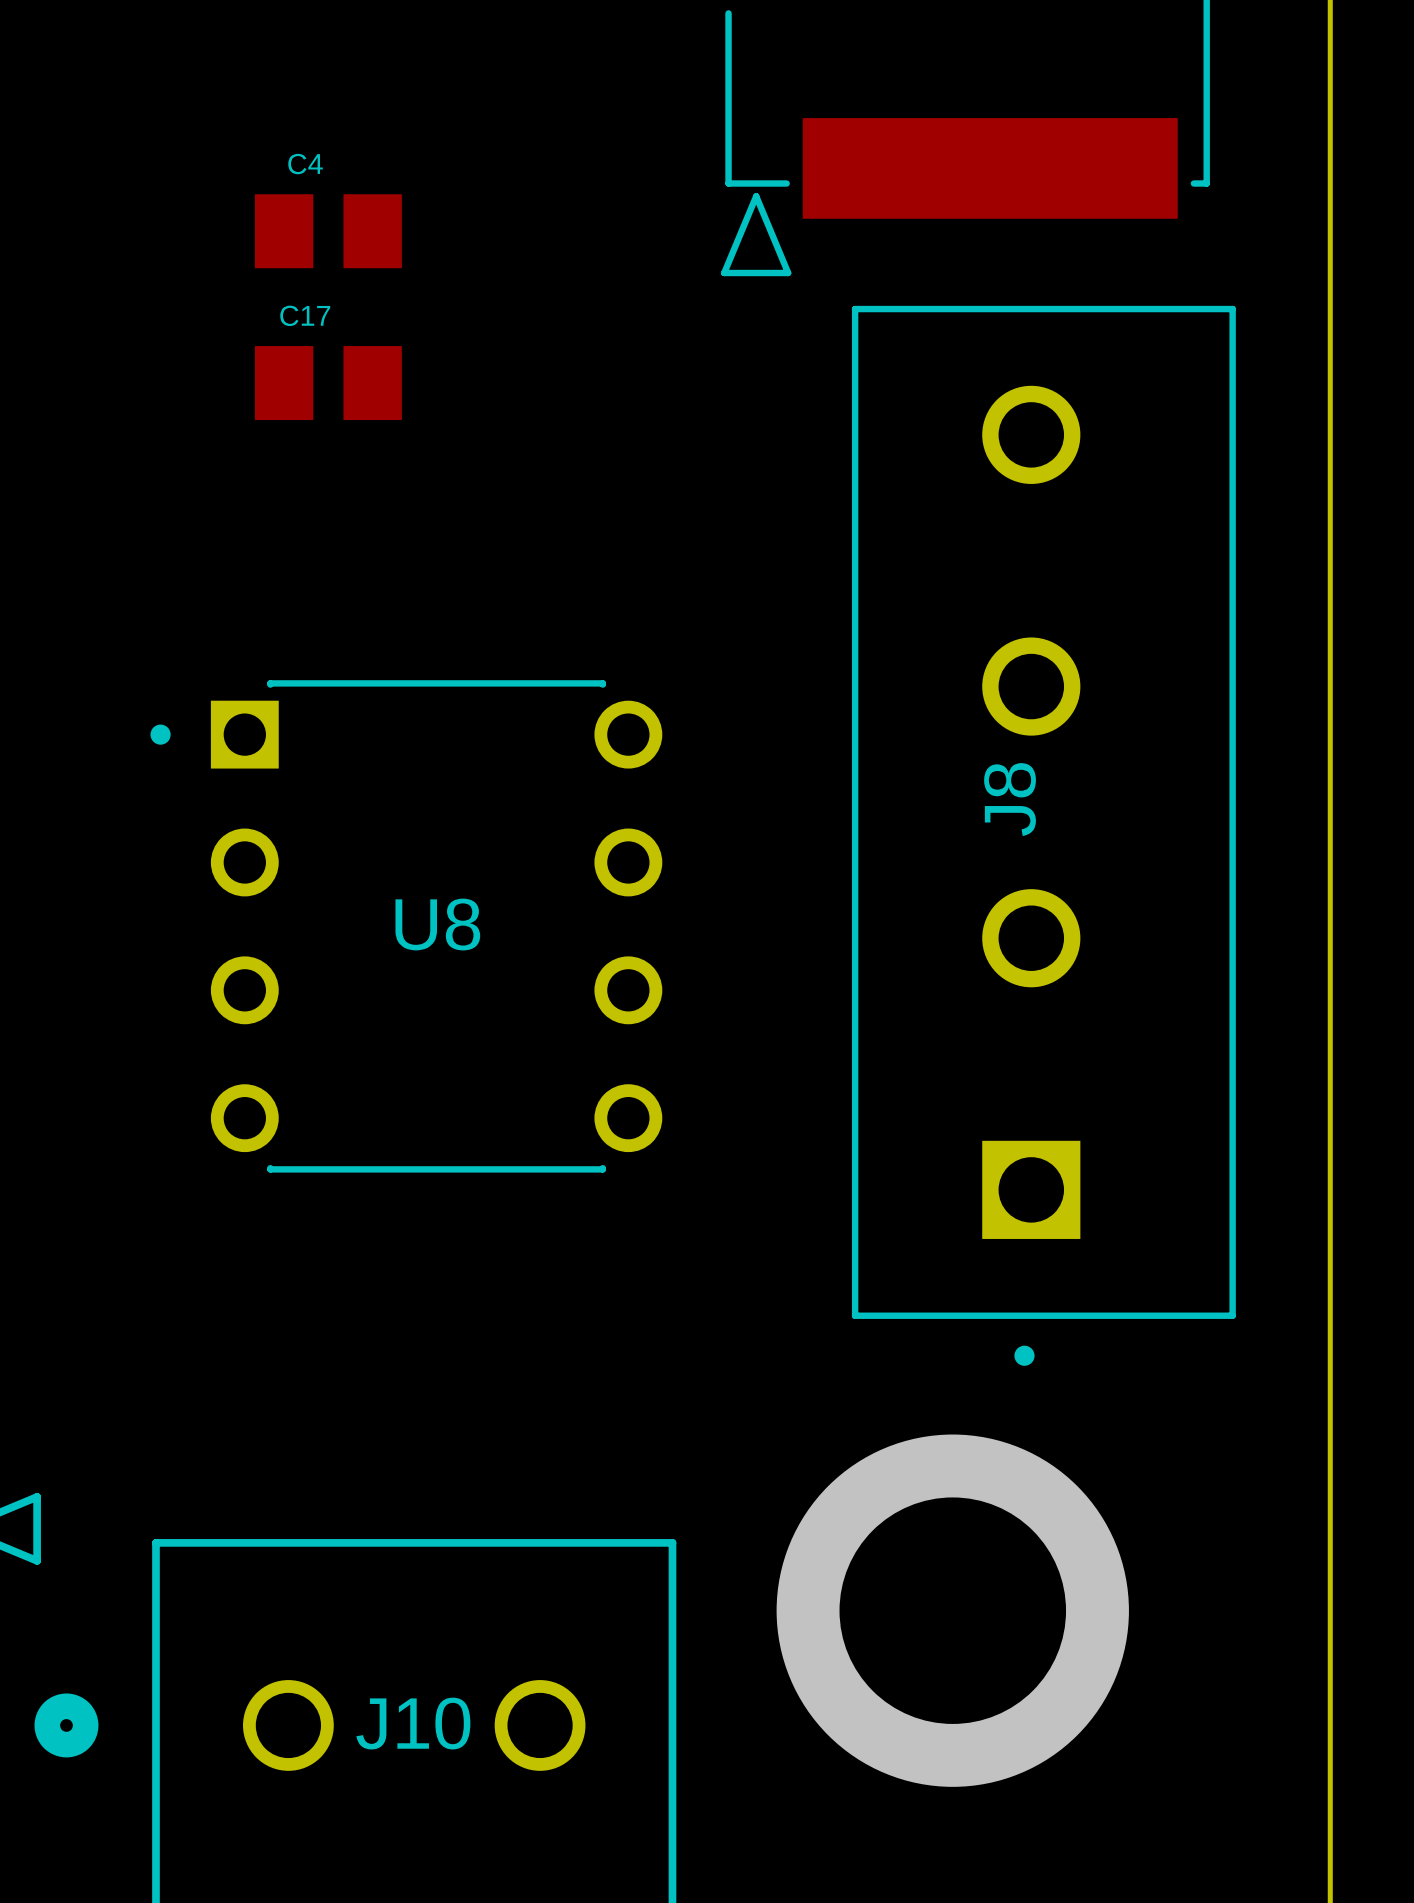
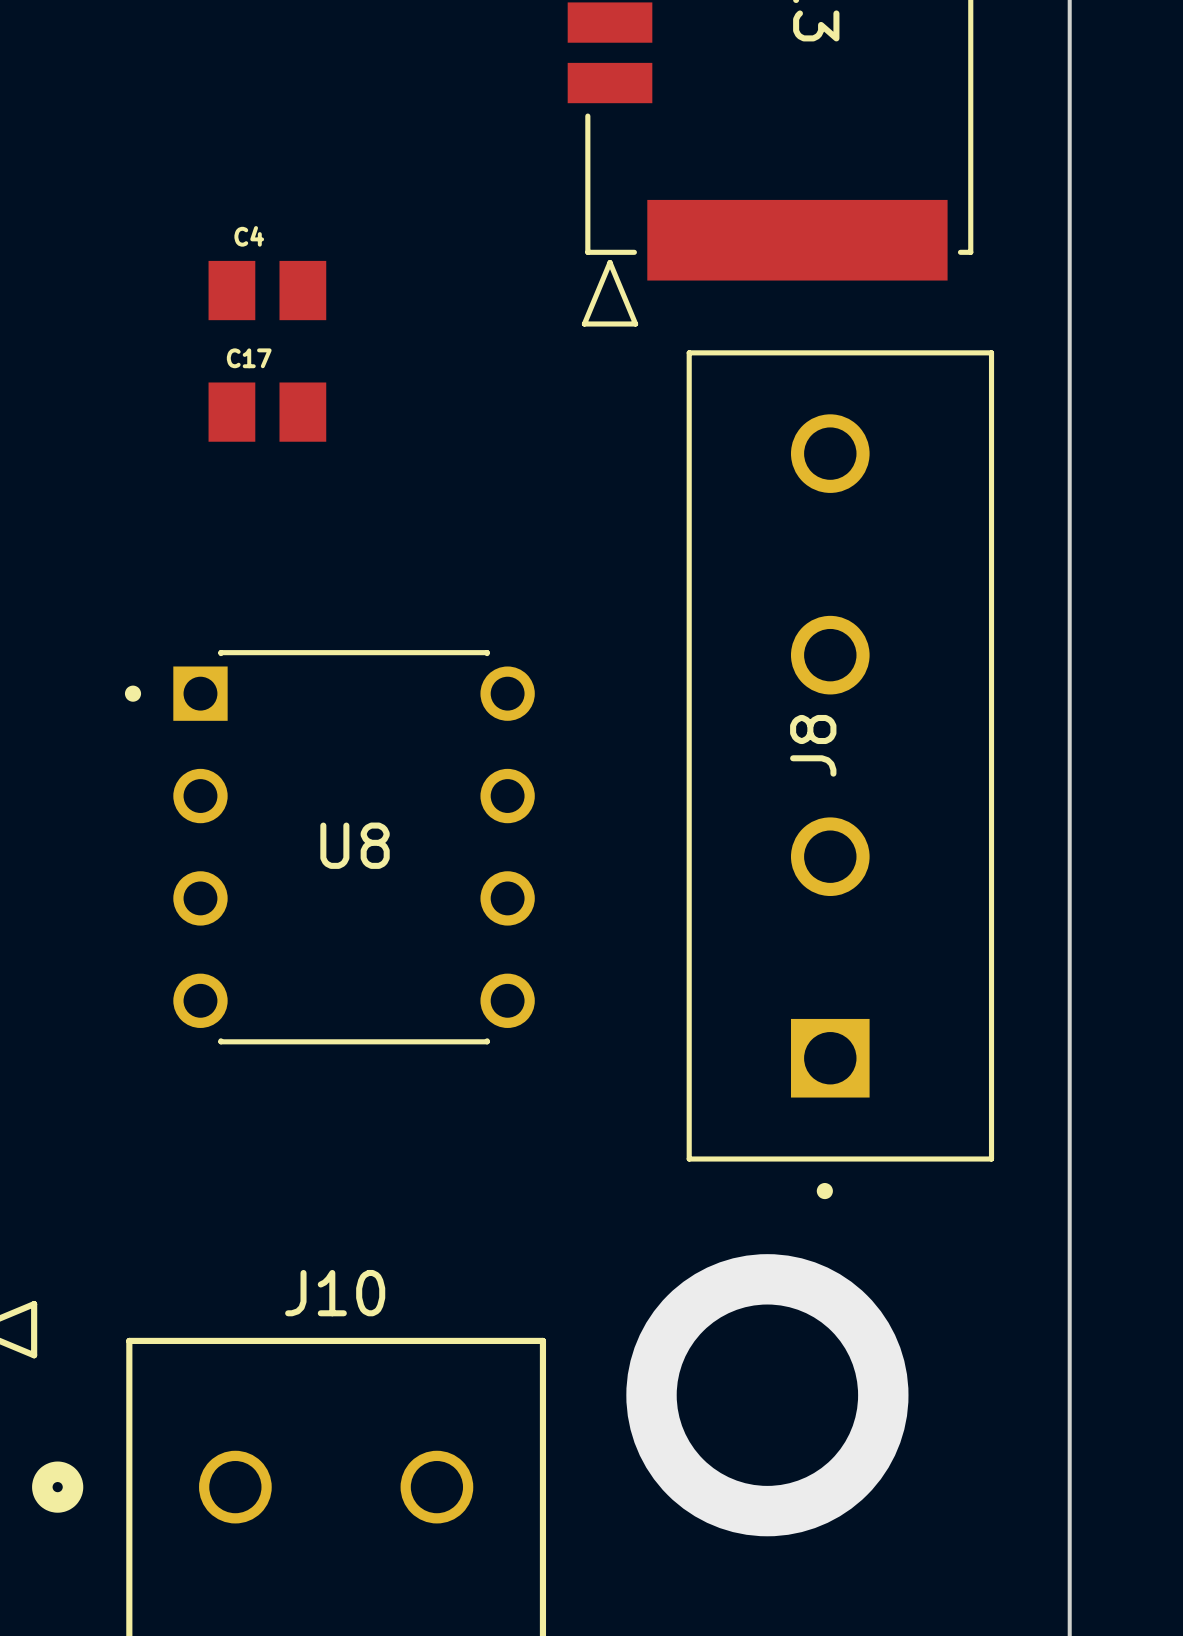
J10 name position: J10 (413, 1723) -> J10 (335, 1293)

